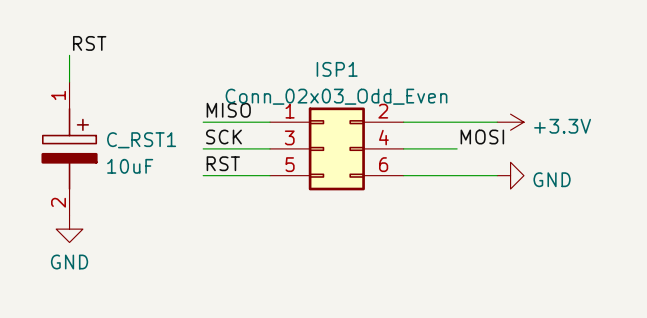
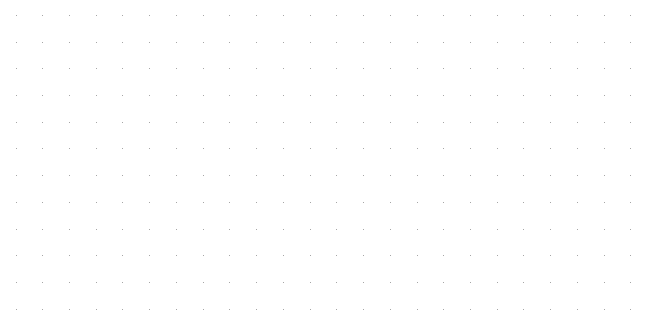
label: RST (89, 43) -> none
wire: (69, 55) (69, 82) -> none
label: MISO (228, 110) -> none
wire: (203, 122) (270, 122) -> none
wire: (403, 122) (497, 122) -> none
power symbol: +3.3V (510, 122) -> none
label: SCK (223, 137) -> none
label: MOSI (482, 137) -> none
C_RST1: 10uF (69, 148) -> none
wire: (203, 148) (270, 148) -> none
ISP1: Conn_02x03_Odd_Even (336, 148) -> none
wire: (403, 148) (457, 148) -> none
label: RST (223, 163) -> none
wire: (203, 175) (270, 175) -> none
wire: (403, 175) (497, 175) -> none
power symbol: GND (510, 175) -> none
power symbol: GND (69, 229) -> none

